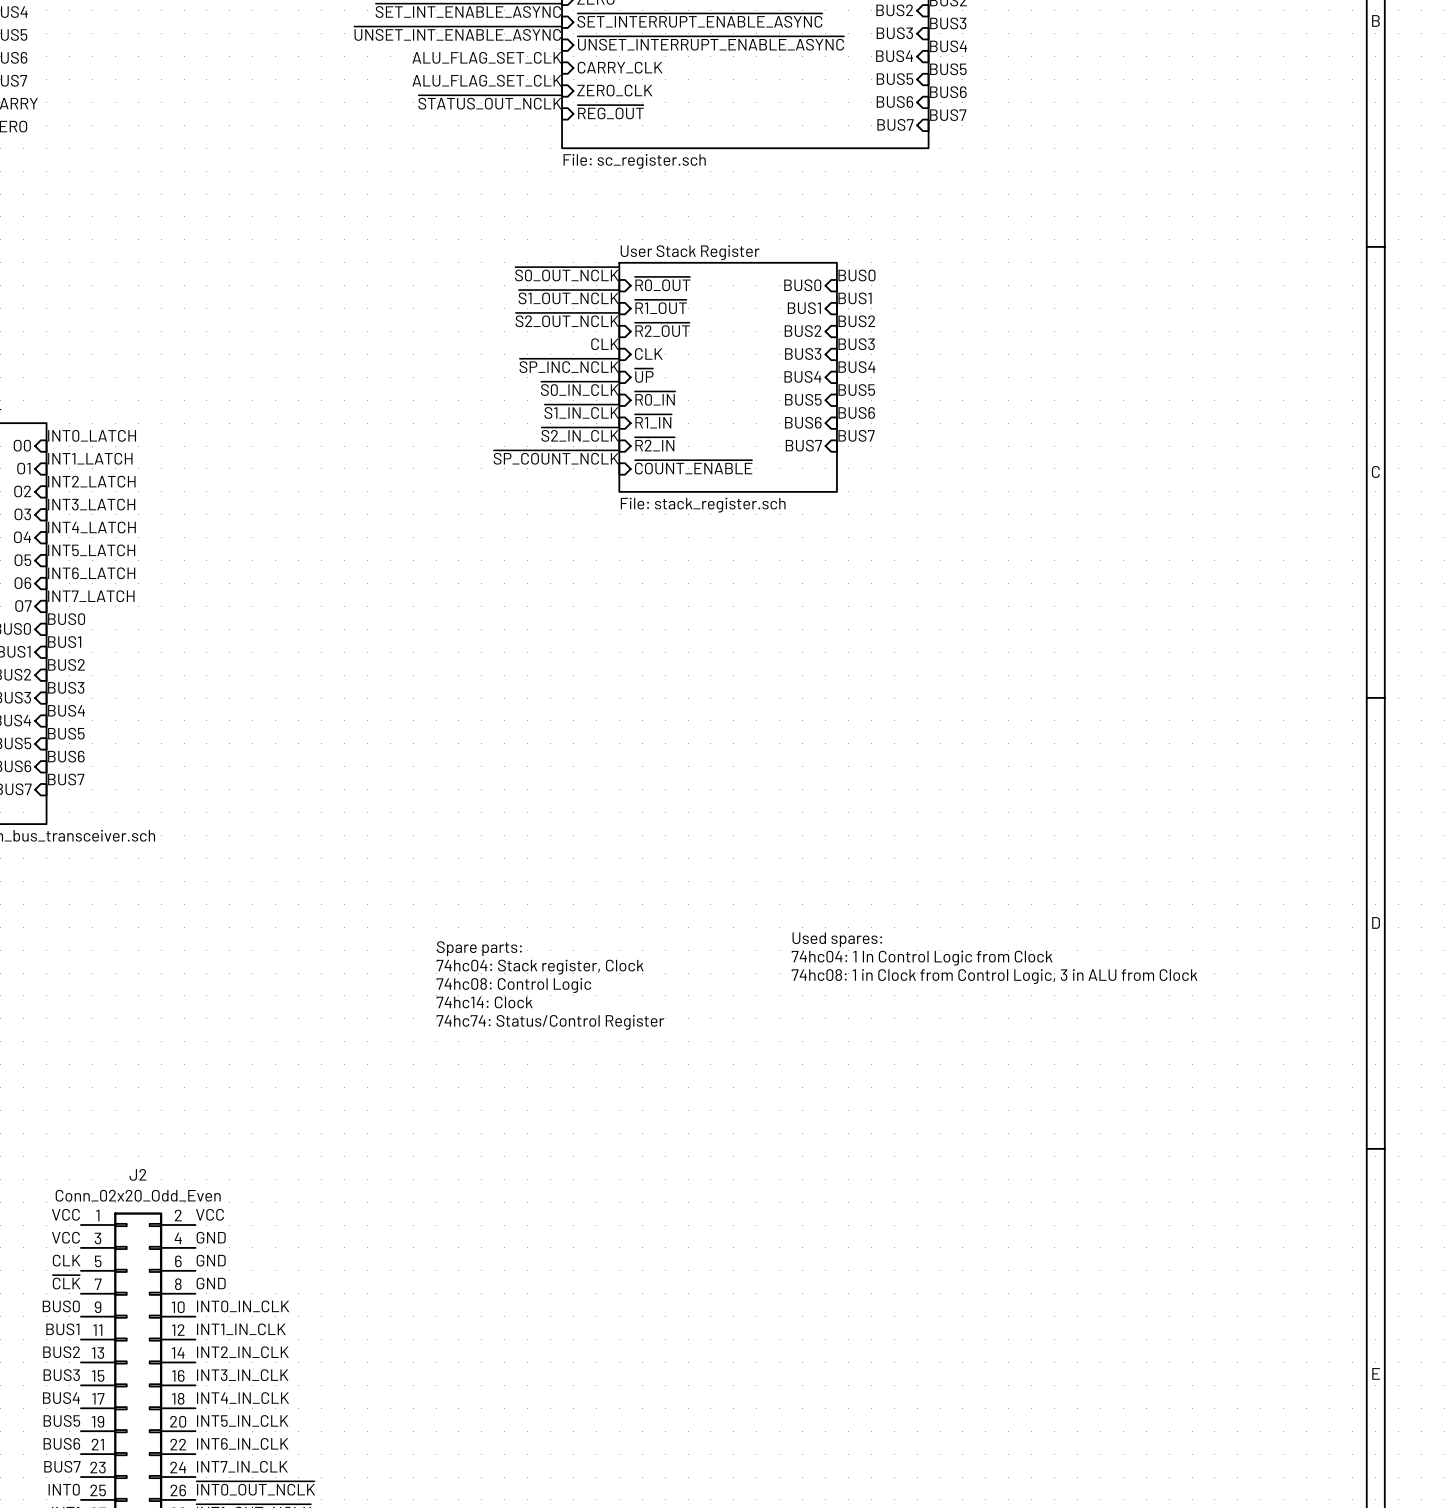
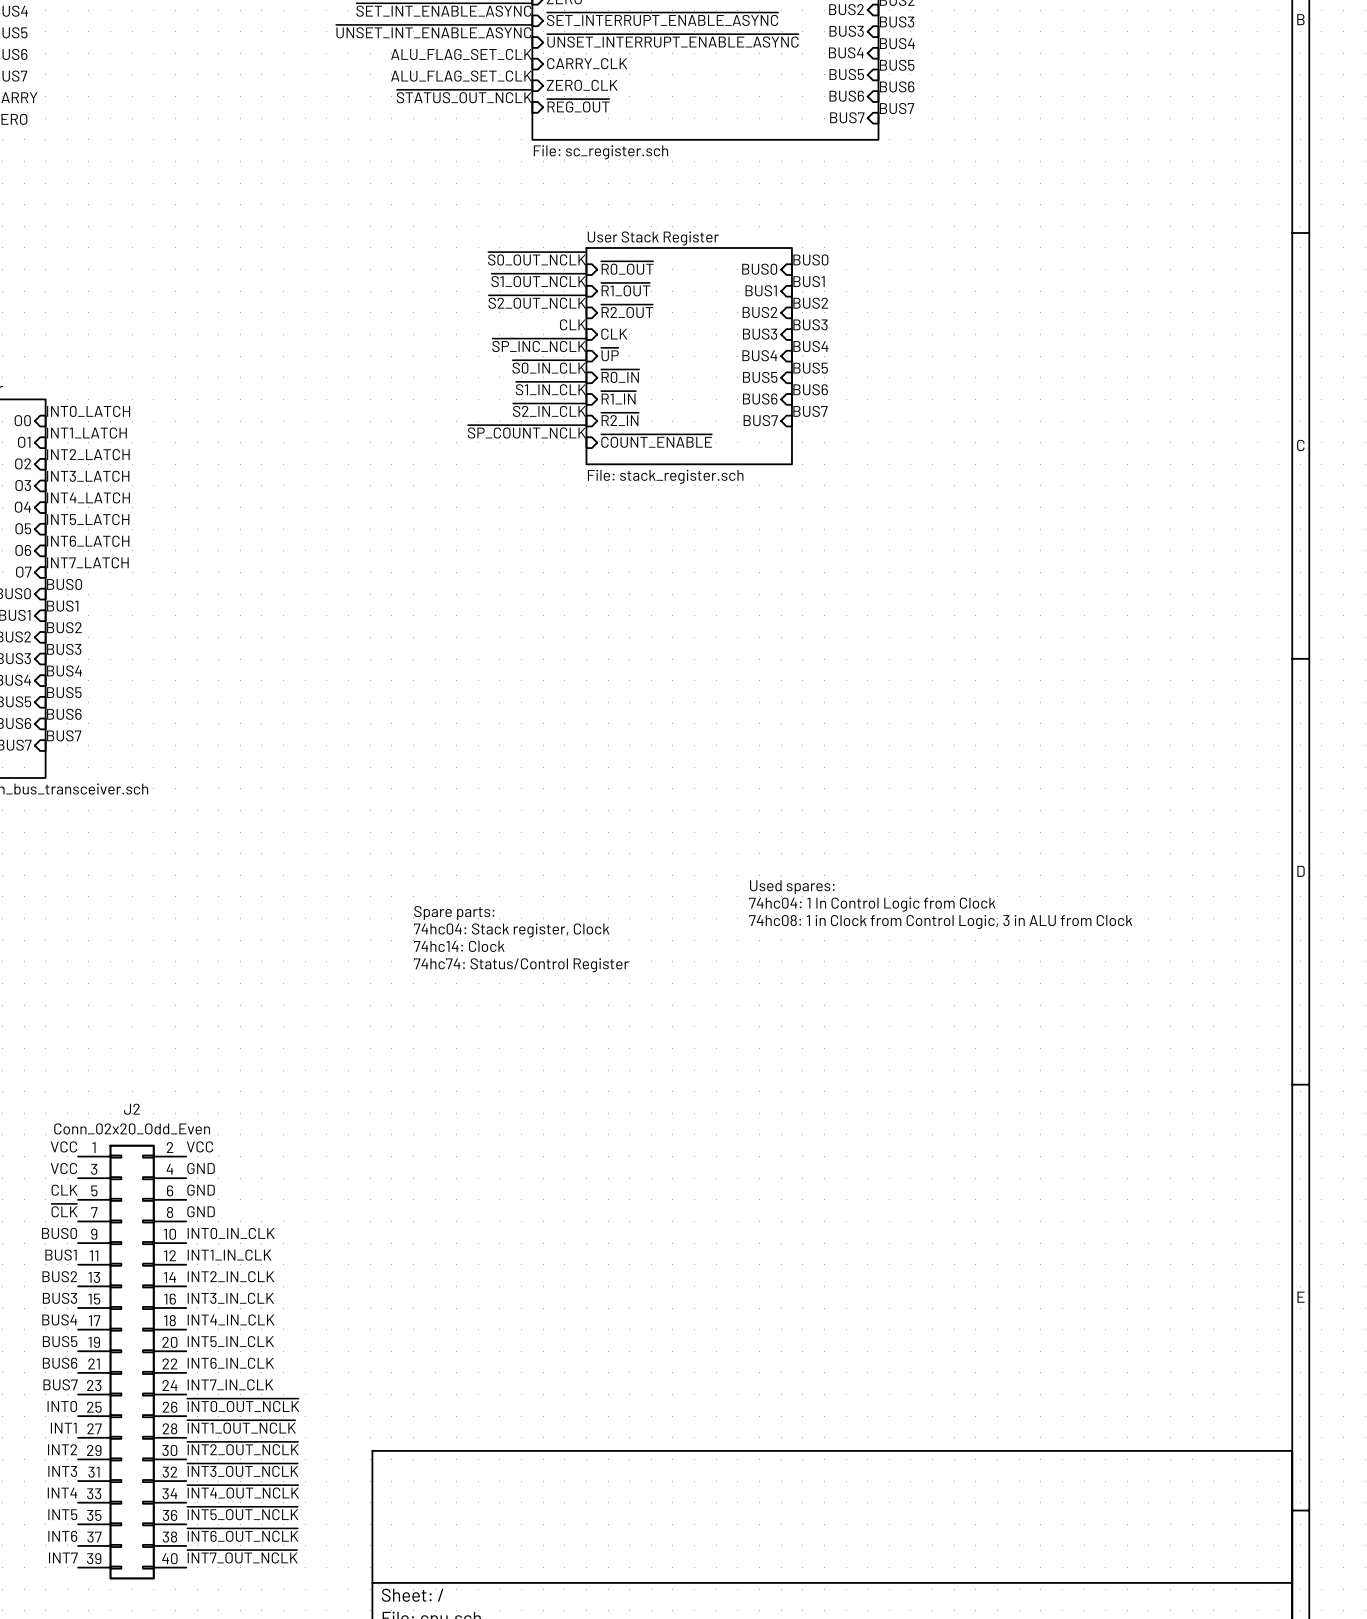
text: Spare parts: (479, 948) -> none
text: 74hc04: Stack register, Clock (540, 967) -> Spare parts: (454, 913)
text: 74hc08: Control Logic (513, 985) -> 74hc04: Stack register, Clock (511, 930)

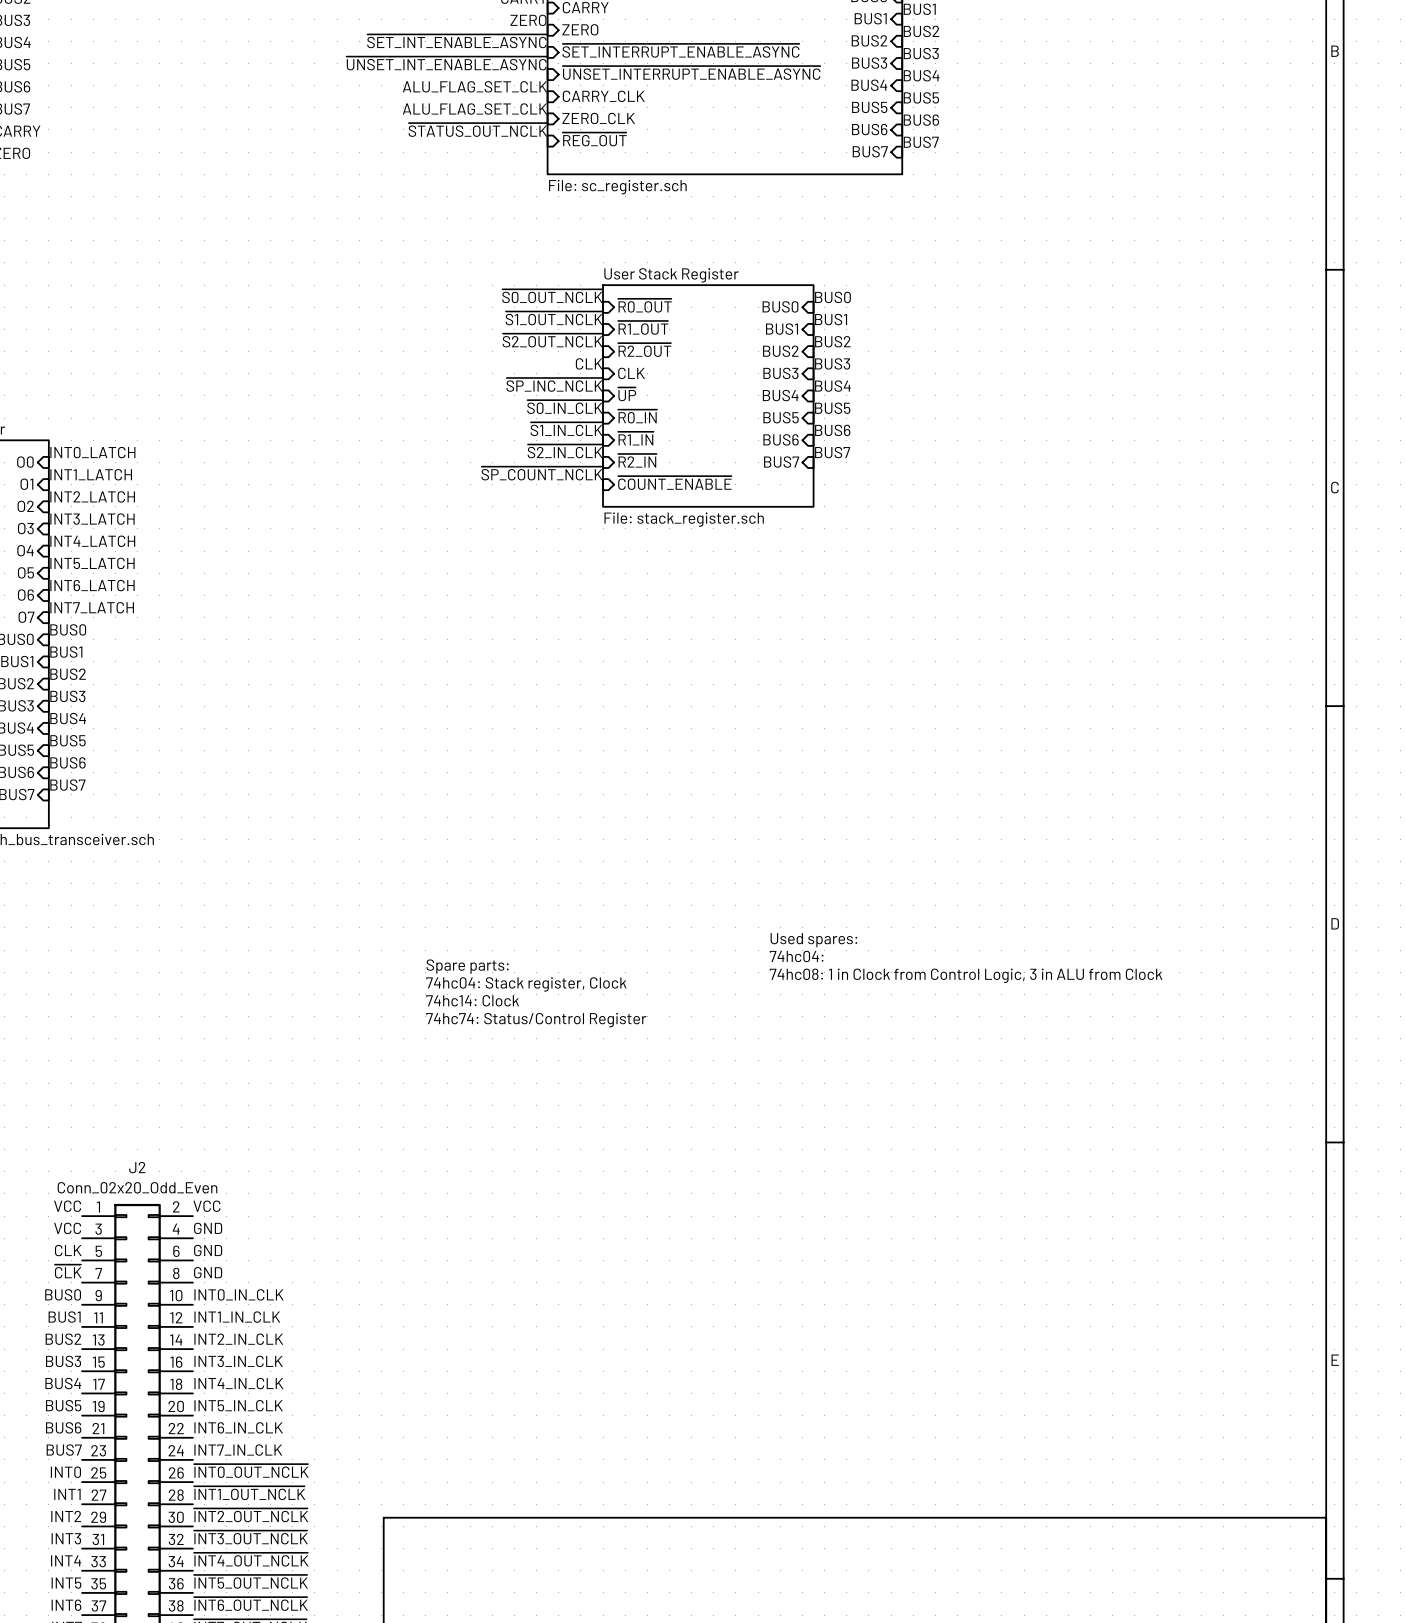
text: 74hc04: 1 In Control Logic from Clock (872, 904) -> 74hc04: (796, 956)

